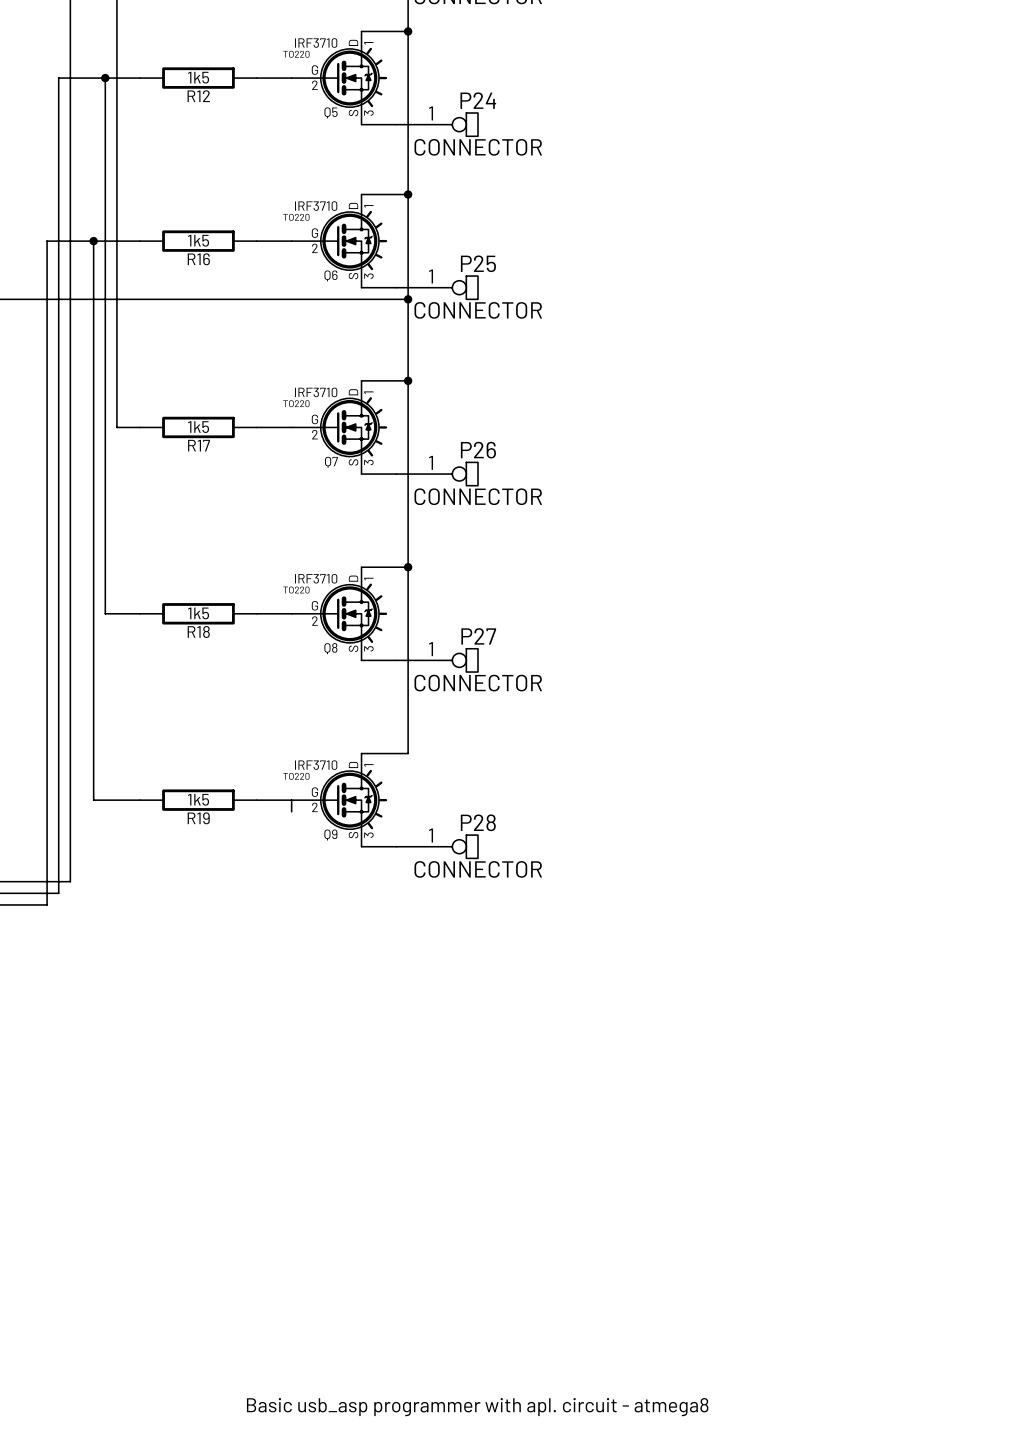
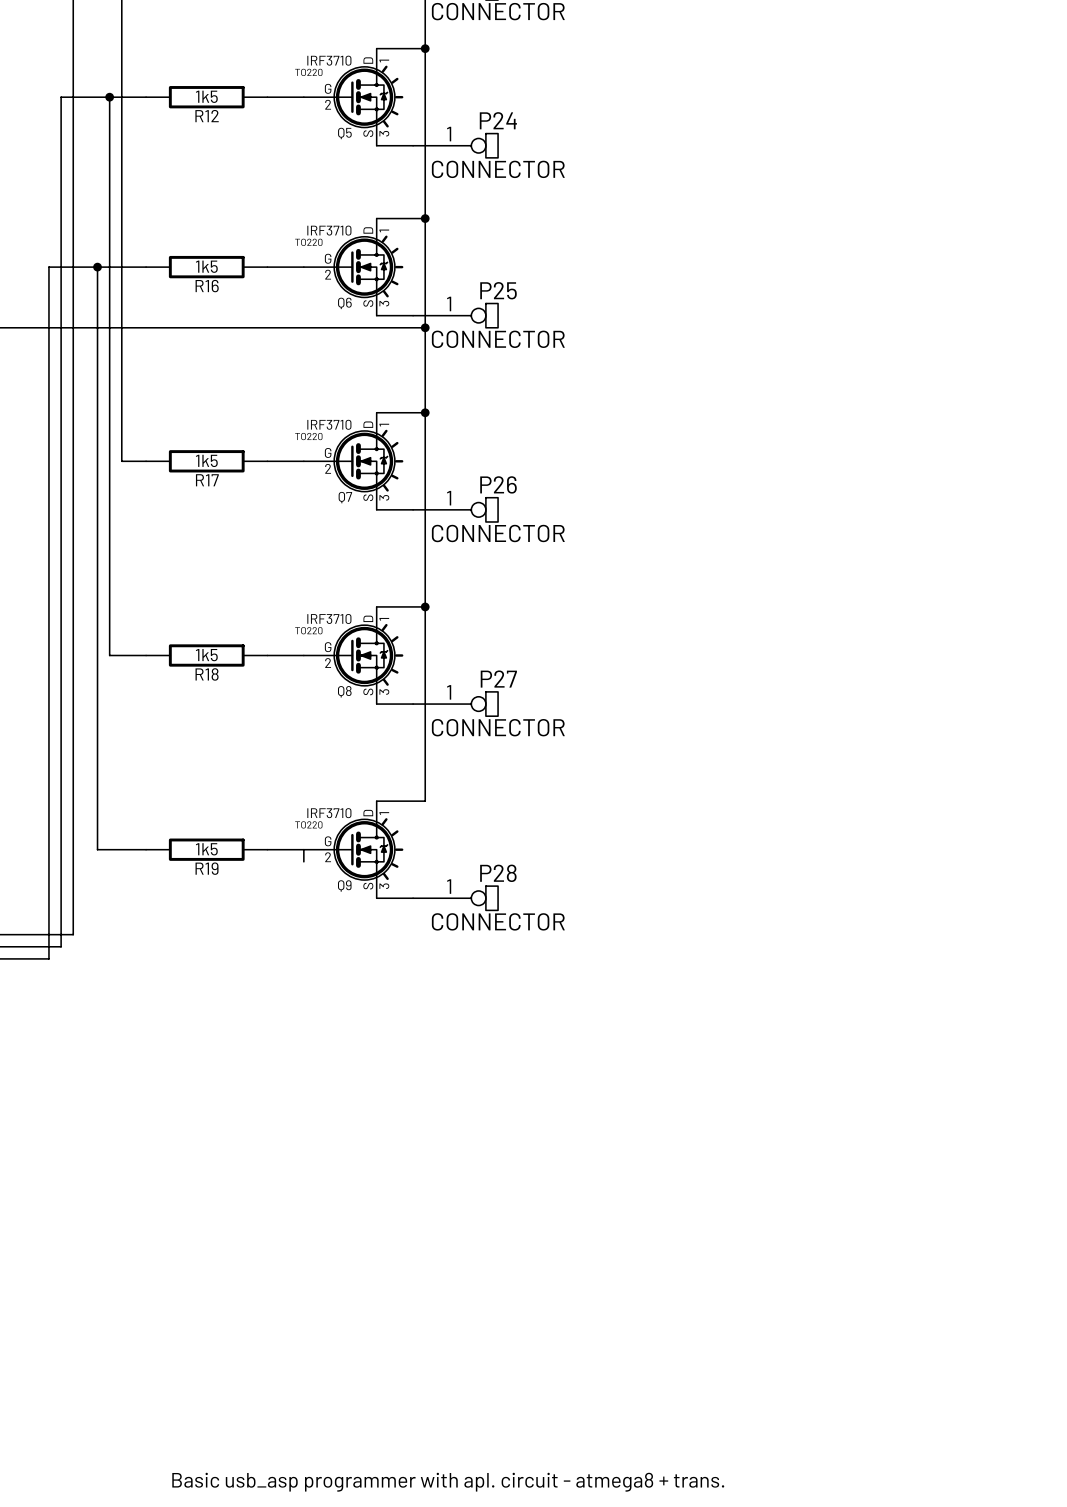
label: Basic usb_asp programmer with apl. circuit - atmega8 (477, 1407) -> Basic usb_asp programmer with apl. circuit - atmega8 + trans. (448, 1482)

